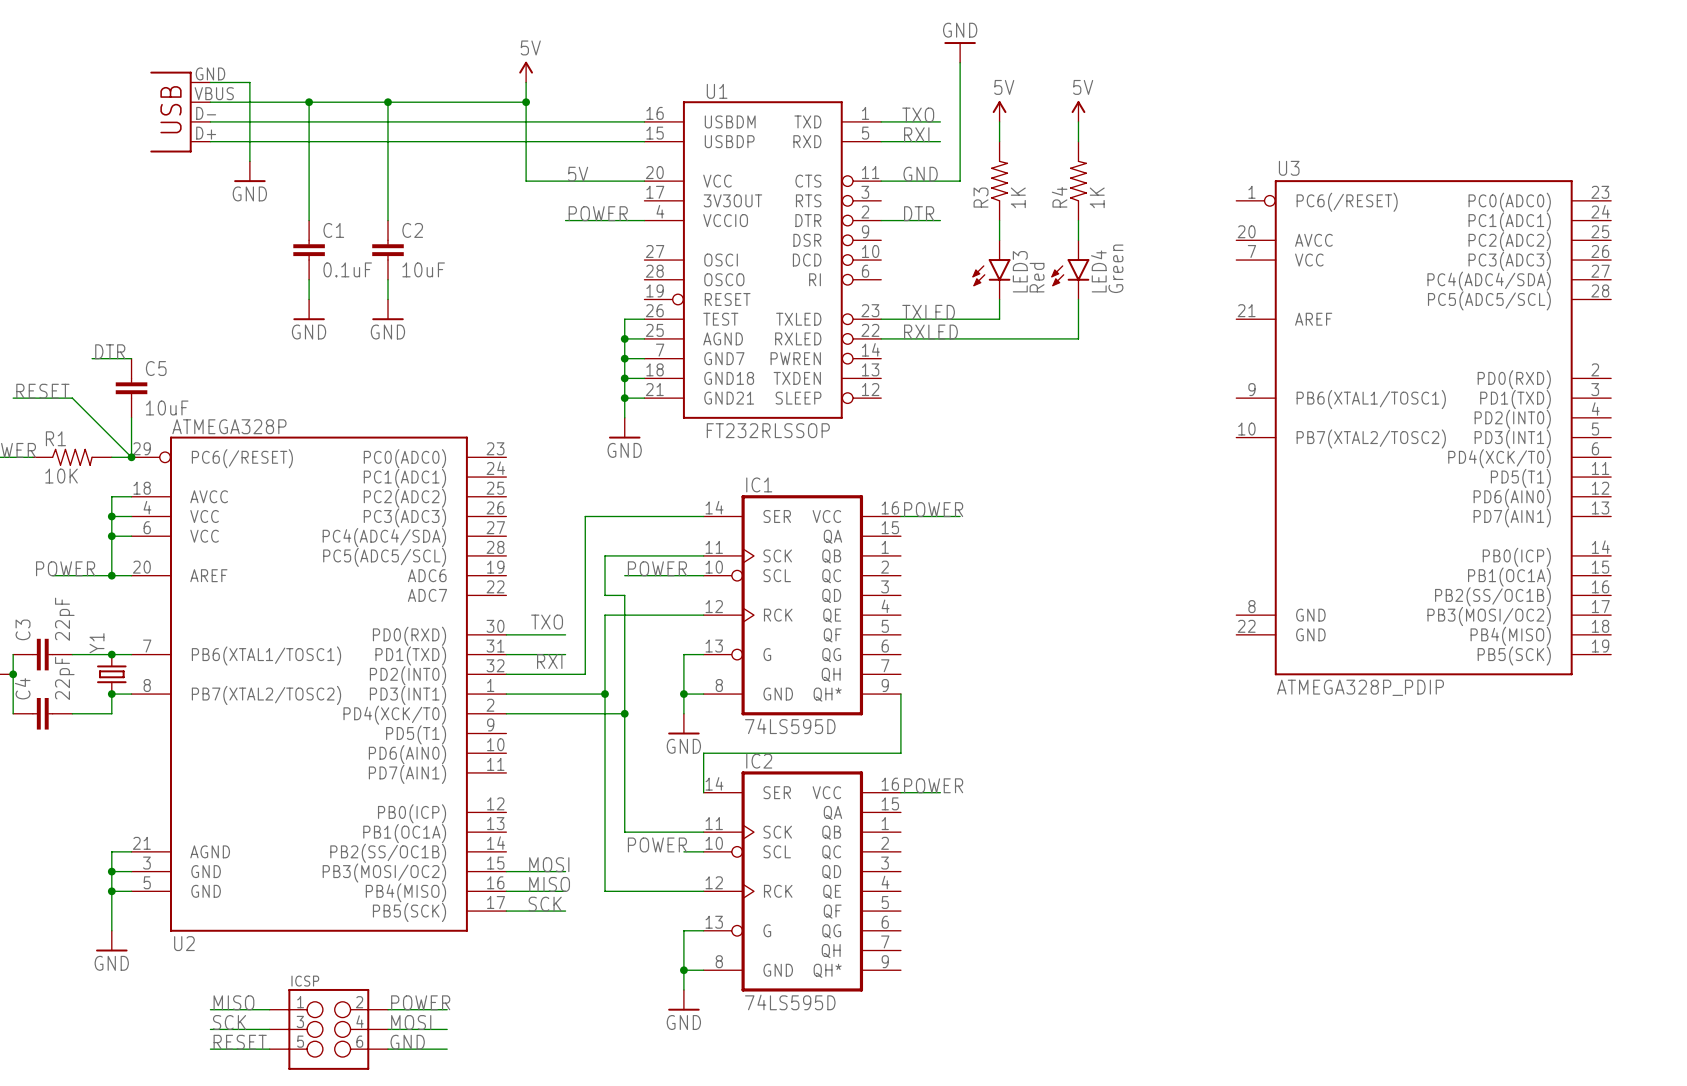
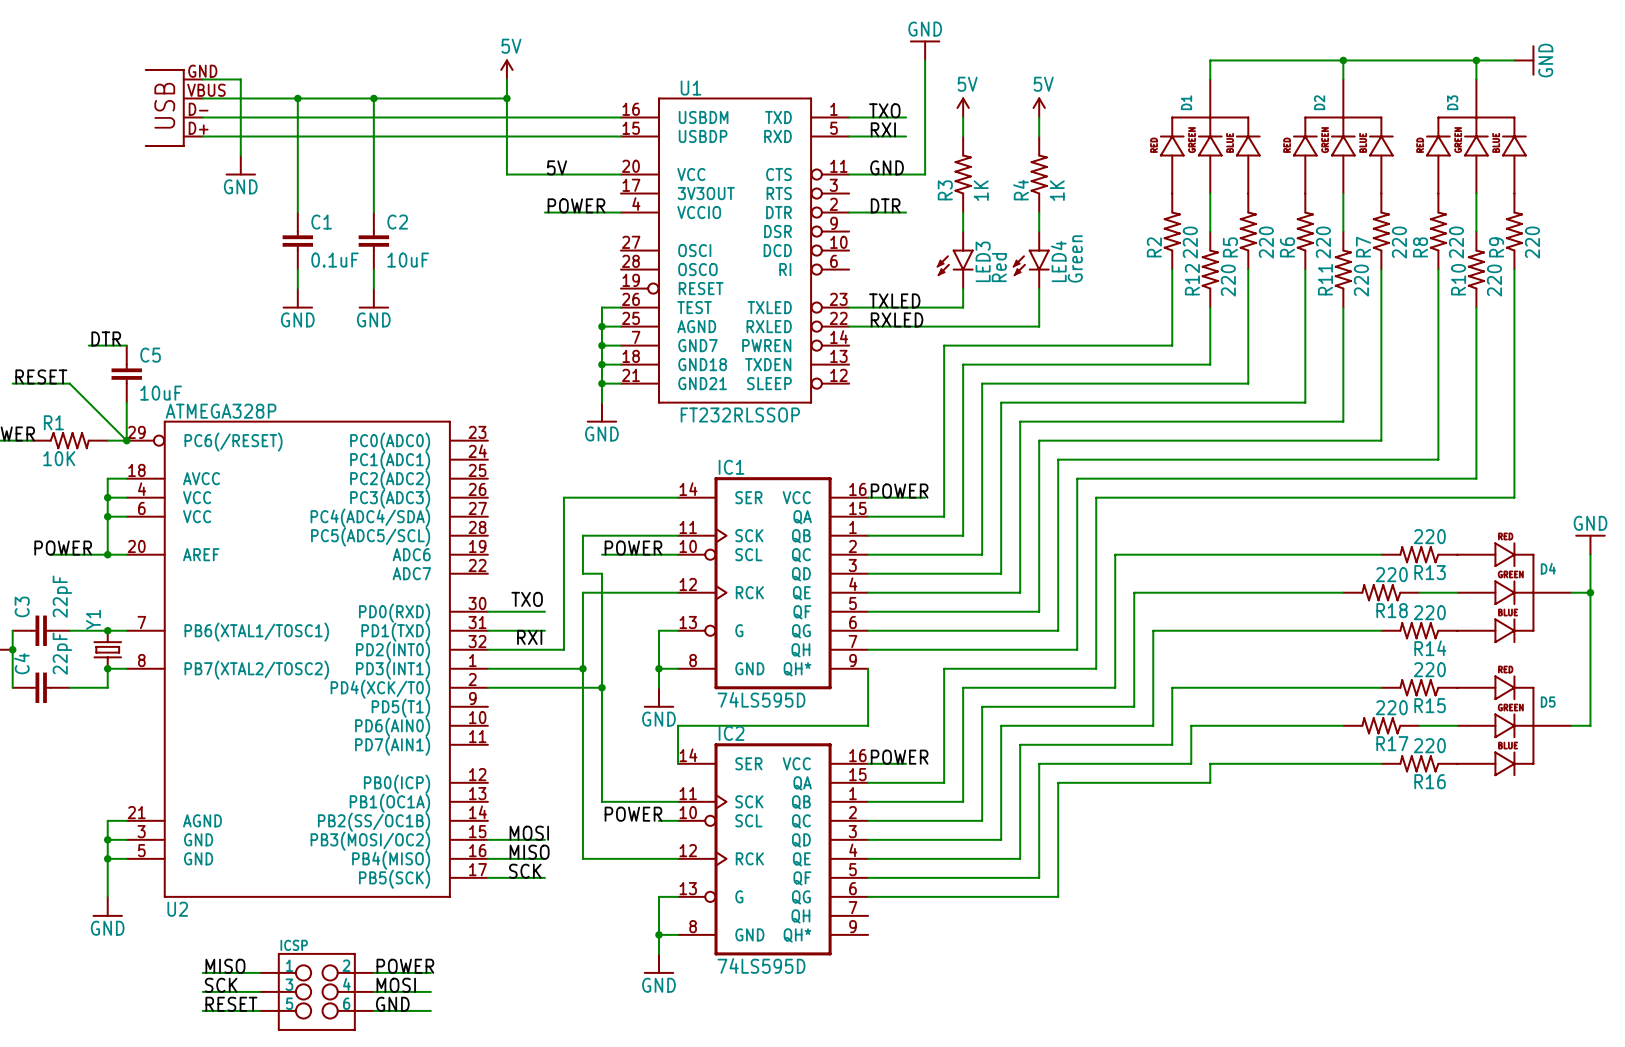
wire: none -> (1343, 60) (1343, 79)
junction: none -> (1343, 60)
wire: none -> (1476, 60) (1476, 79)
junction: none -> (1476, 60)
wire: none -> (1514, 60) (1210, 60) (1210, 79)
power symbol: none -> GND (1524, 60)
D1: none -> (1210, 136)
D2: none -> (1343, 136)
D3: none -> (1476, 136)
wire: none -> (1210, 193) (1210, 231)
wire: none -> (1343, 193) (1343, 231)
wire: none -> (1476, 193) (1476, 231)
R2: none -> 220 (1172, 231)
R5: none -> 220 (1248, 231)
R6: none -> 220 (1305, 231)
R7: none -> 220 (1381, 231)
R8: none -> 220 (1438, 231)
R9: none -> 220 (1514, 231)
wire: none -> (1172, 269) (1172, 345) (944, 345) (944, 516) (868, 516)
R12: none -> 220 (1210, 269)
wire: none -> (1248, 269) (1248, 383) (982, 383) (982, 554) (868, 554)
wire: none -> (1305, 269) (1305, 402) (1001, 402) (1001, 573) (868, 573)
R11: none -> 220 (1343, 269)
wire: none -> (1381, 269) (1381, 440) (1039, 440) (1039, 611) (868, 611)
wire: none -> (1438, 269) (1438, 459) (1058, 459) (1058, 630) (868, 630)
R10: none -> 220 (1476, 269)
wire: none -> (1514, 269) (1514, 497) (1096, 497) (1096, 668) (944, 668) (944, 782) (868, 782)
wire: none -> (1210, 307) (1210, 364) (963, 364) (963, 535) (868, 535)
wire: none -> (1343, 307) (1343, 421) (1020, 421) (1020, 592) (868, 592)
wire: none -> (1476, 307) (1476, 478) (1077, 478) (1077, 649) (868, 649)
U3: ATMEGA328P_PDIP (1423, 427) -> none
power symbol: none -> GND (1590, 544)
wire: none -> (1381, 554) (1115, 554) (1115, 687) (963, 687) (963, 801) (868, 801)
R13: none -> 220 (1419, 554)
wire: none -> (1590, 554) (1590, 725) (1571, 725)
wire: none -> (1343, 592) (1134, 592) (1134, 706) (982, 706) (982, 820) (868, 820)
R18: none -> 220 (1381, 592)
wire: none -> (1419, 592) (1457, 592)
D4: none -> (1514, 592)
wire: none -> (1571, 592) (1590, 592)
junction: none -> (1590, 592)
wire: none -> (1381, 630) (1153, 630) (1153, 725) (1001, 725) (1001, 839) (868, 839)
R14: none -> 220 (1419, 630)
wire: none -> (1381, 687) (1172, 687) (1172, 744) (1020, 744) (1020, 858) (868, 858)
R15: none -> 220 (1419, 687)
wire: none -> (1343, 725) (1191, 725) (1191, 763) (1039, 763) (1039, 877) (868, 877)
R17: none -> 220 (1381, 725)
wire: none -> (1419, 725) (1457, 725)
D5: none -> (1514, 725)
wire: none -> (1381, 763) (1210, 763) (1210, 782) (1058, 782) (1058, 896) (868, 896)
R16: none -> 220 (1419, 763)

